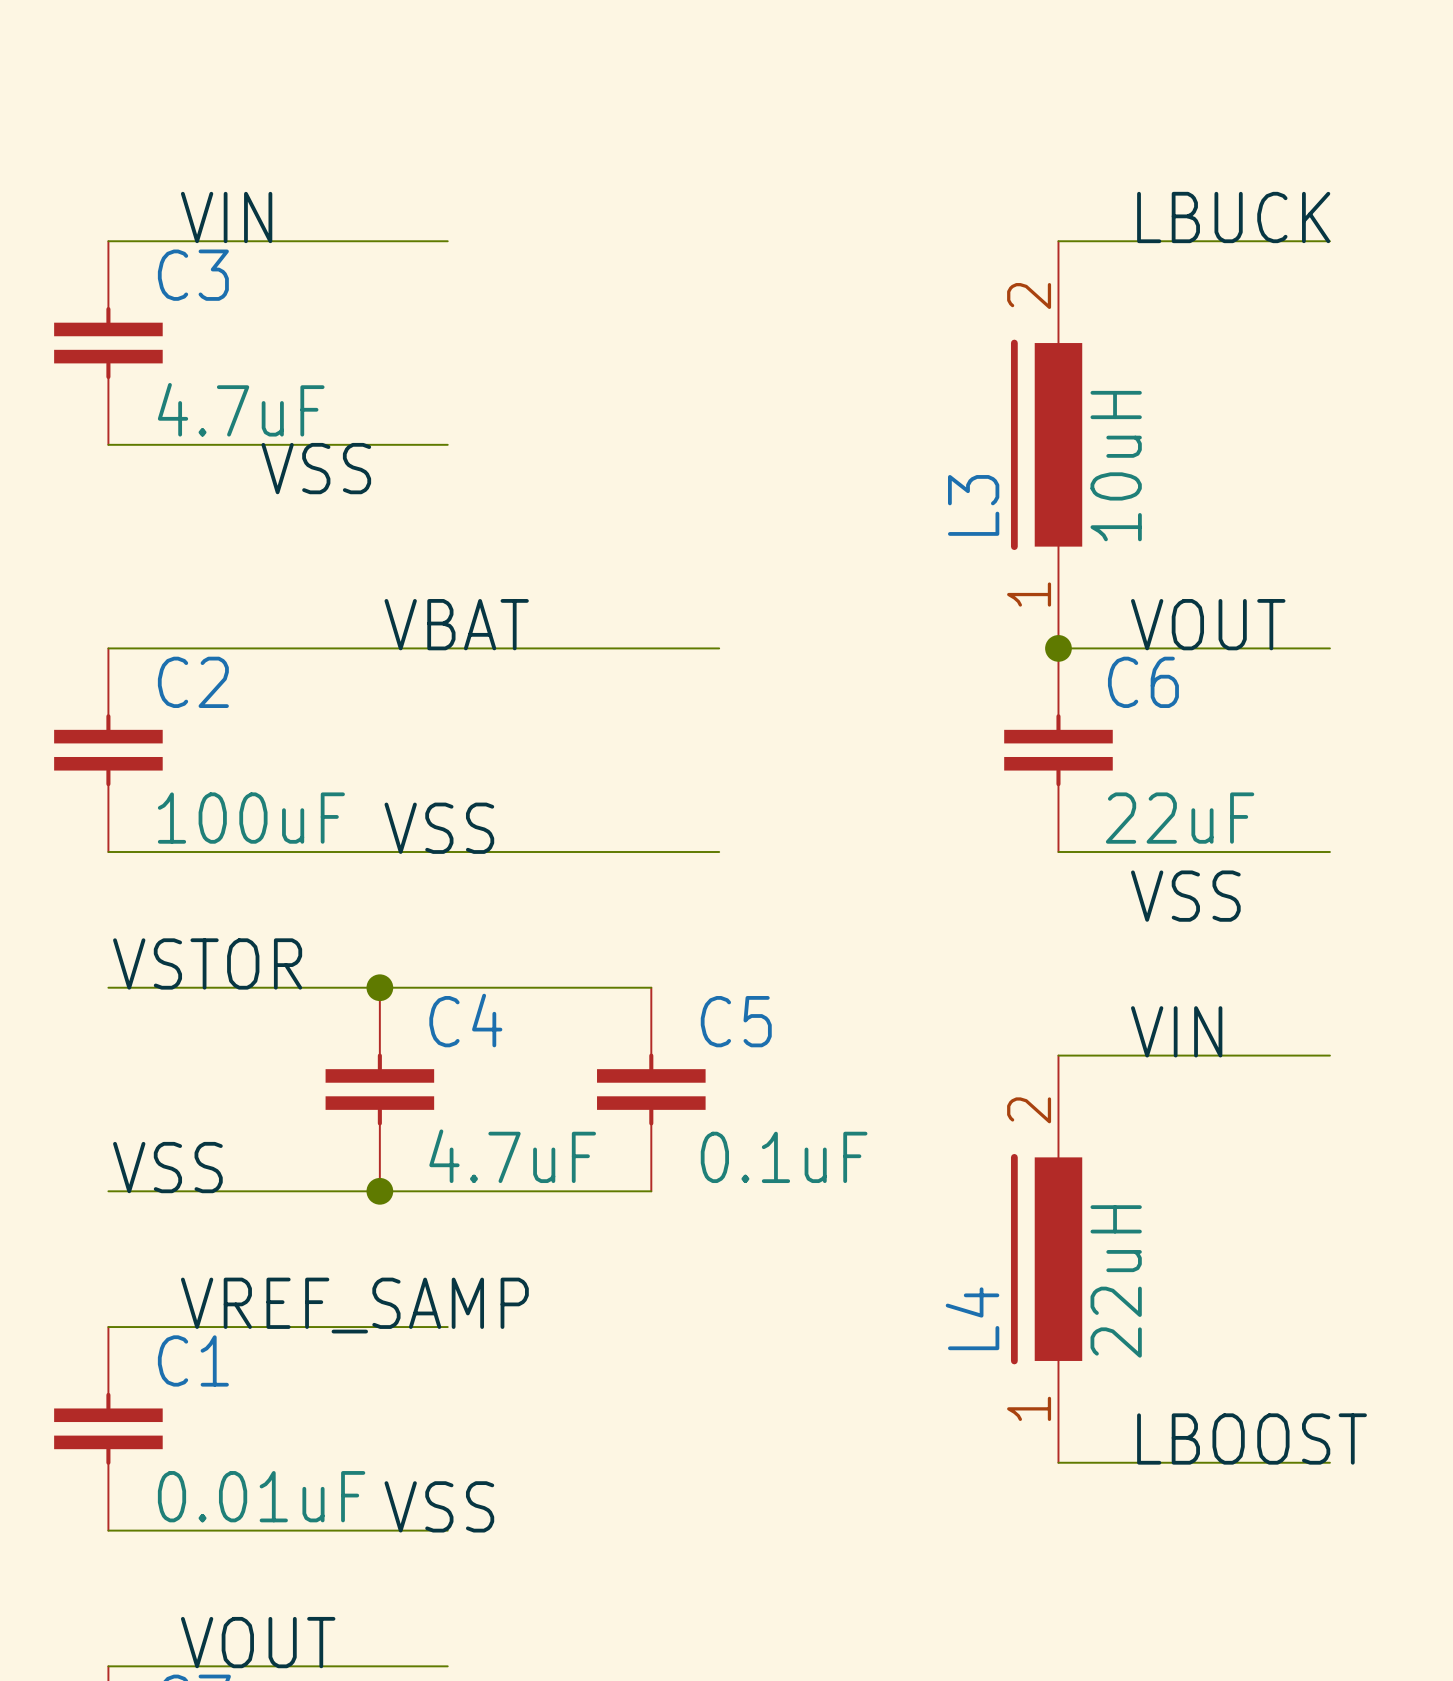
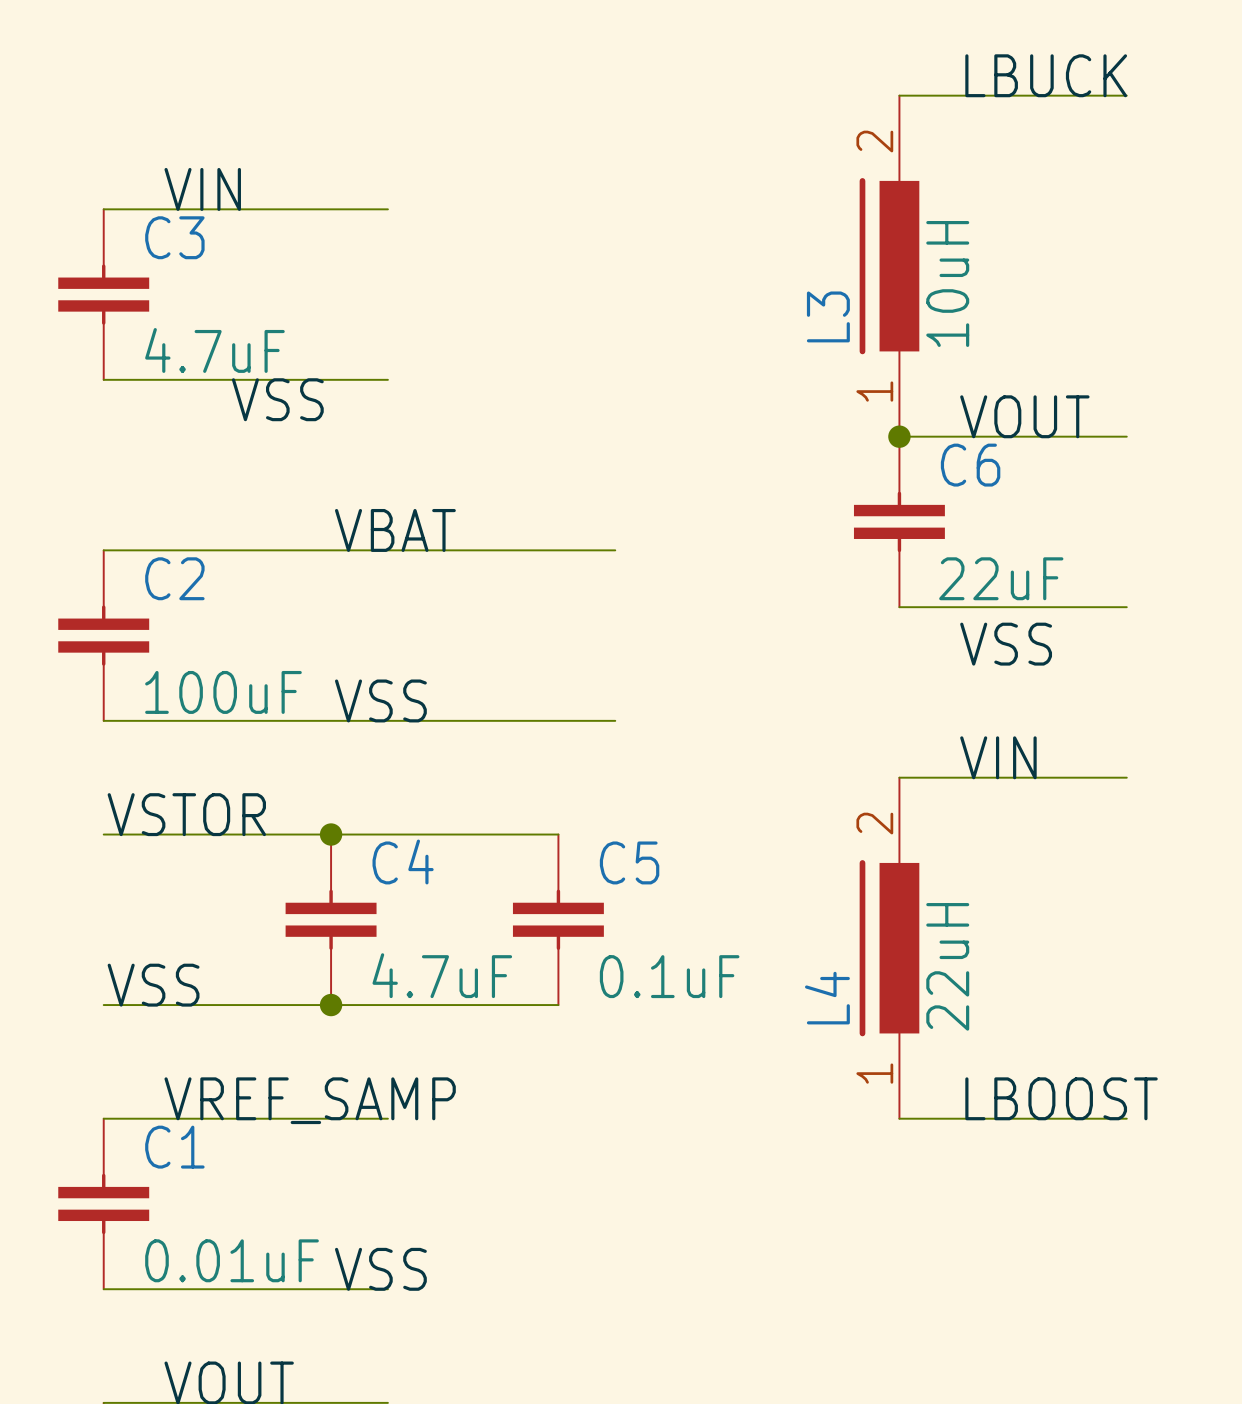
label position: LBUCK (1233, 217) -> LBUCK (1046, 75)
wire: (1058, 241) (1329, 241) -> (899, 95) (1126, 95)
L3 position: (1046, 444) -> (889, 266)
label position: VOUT (1208, 624) -> VOUT (1024, 416)
wire: (1058, 648) (1329, 648) -> (899, 436) (1126, 436)
junction position: (1058, 648) -> (899, 436)
C6 position: (1058, 750) -> (899, 521)
label: none -> VSS (1006, 644)
wire: (1058, 852) (1329, 852) -> (899, 607) (1126, 607)
label: VSS (1185, 896) -> VIN (998, 757)
label: VIN (1176, 1031) -> none
wire: (1058, 1055) (1329, 1055) -> (899, 777) (1126, 777)
L4 position: (1046, 1259) -> (889, 948)
label position: LBOOST (1252, 1439) -> LBOOST (1061, 1098)
wire: (1058, 1462) (1329, 1462) -> (899, 1118) (1126, 1118)

